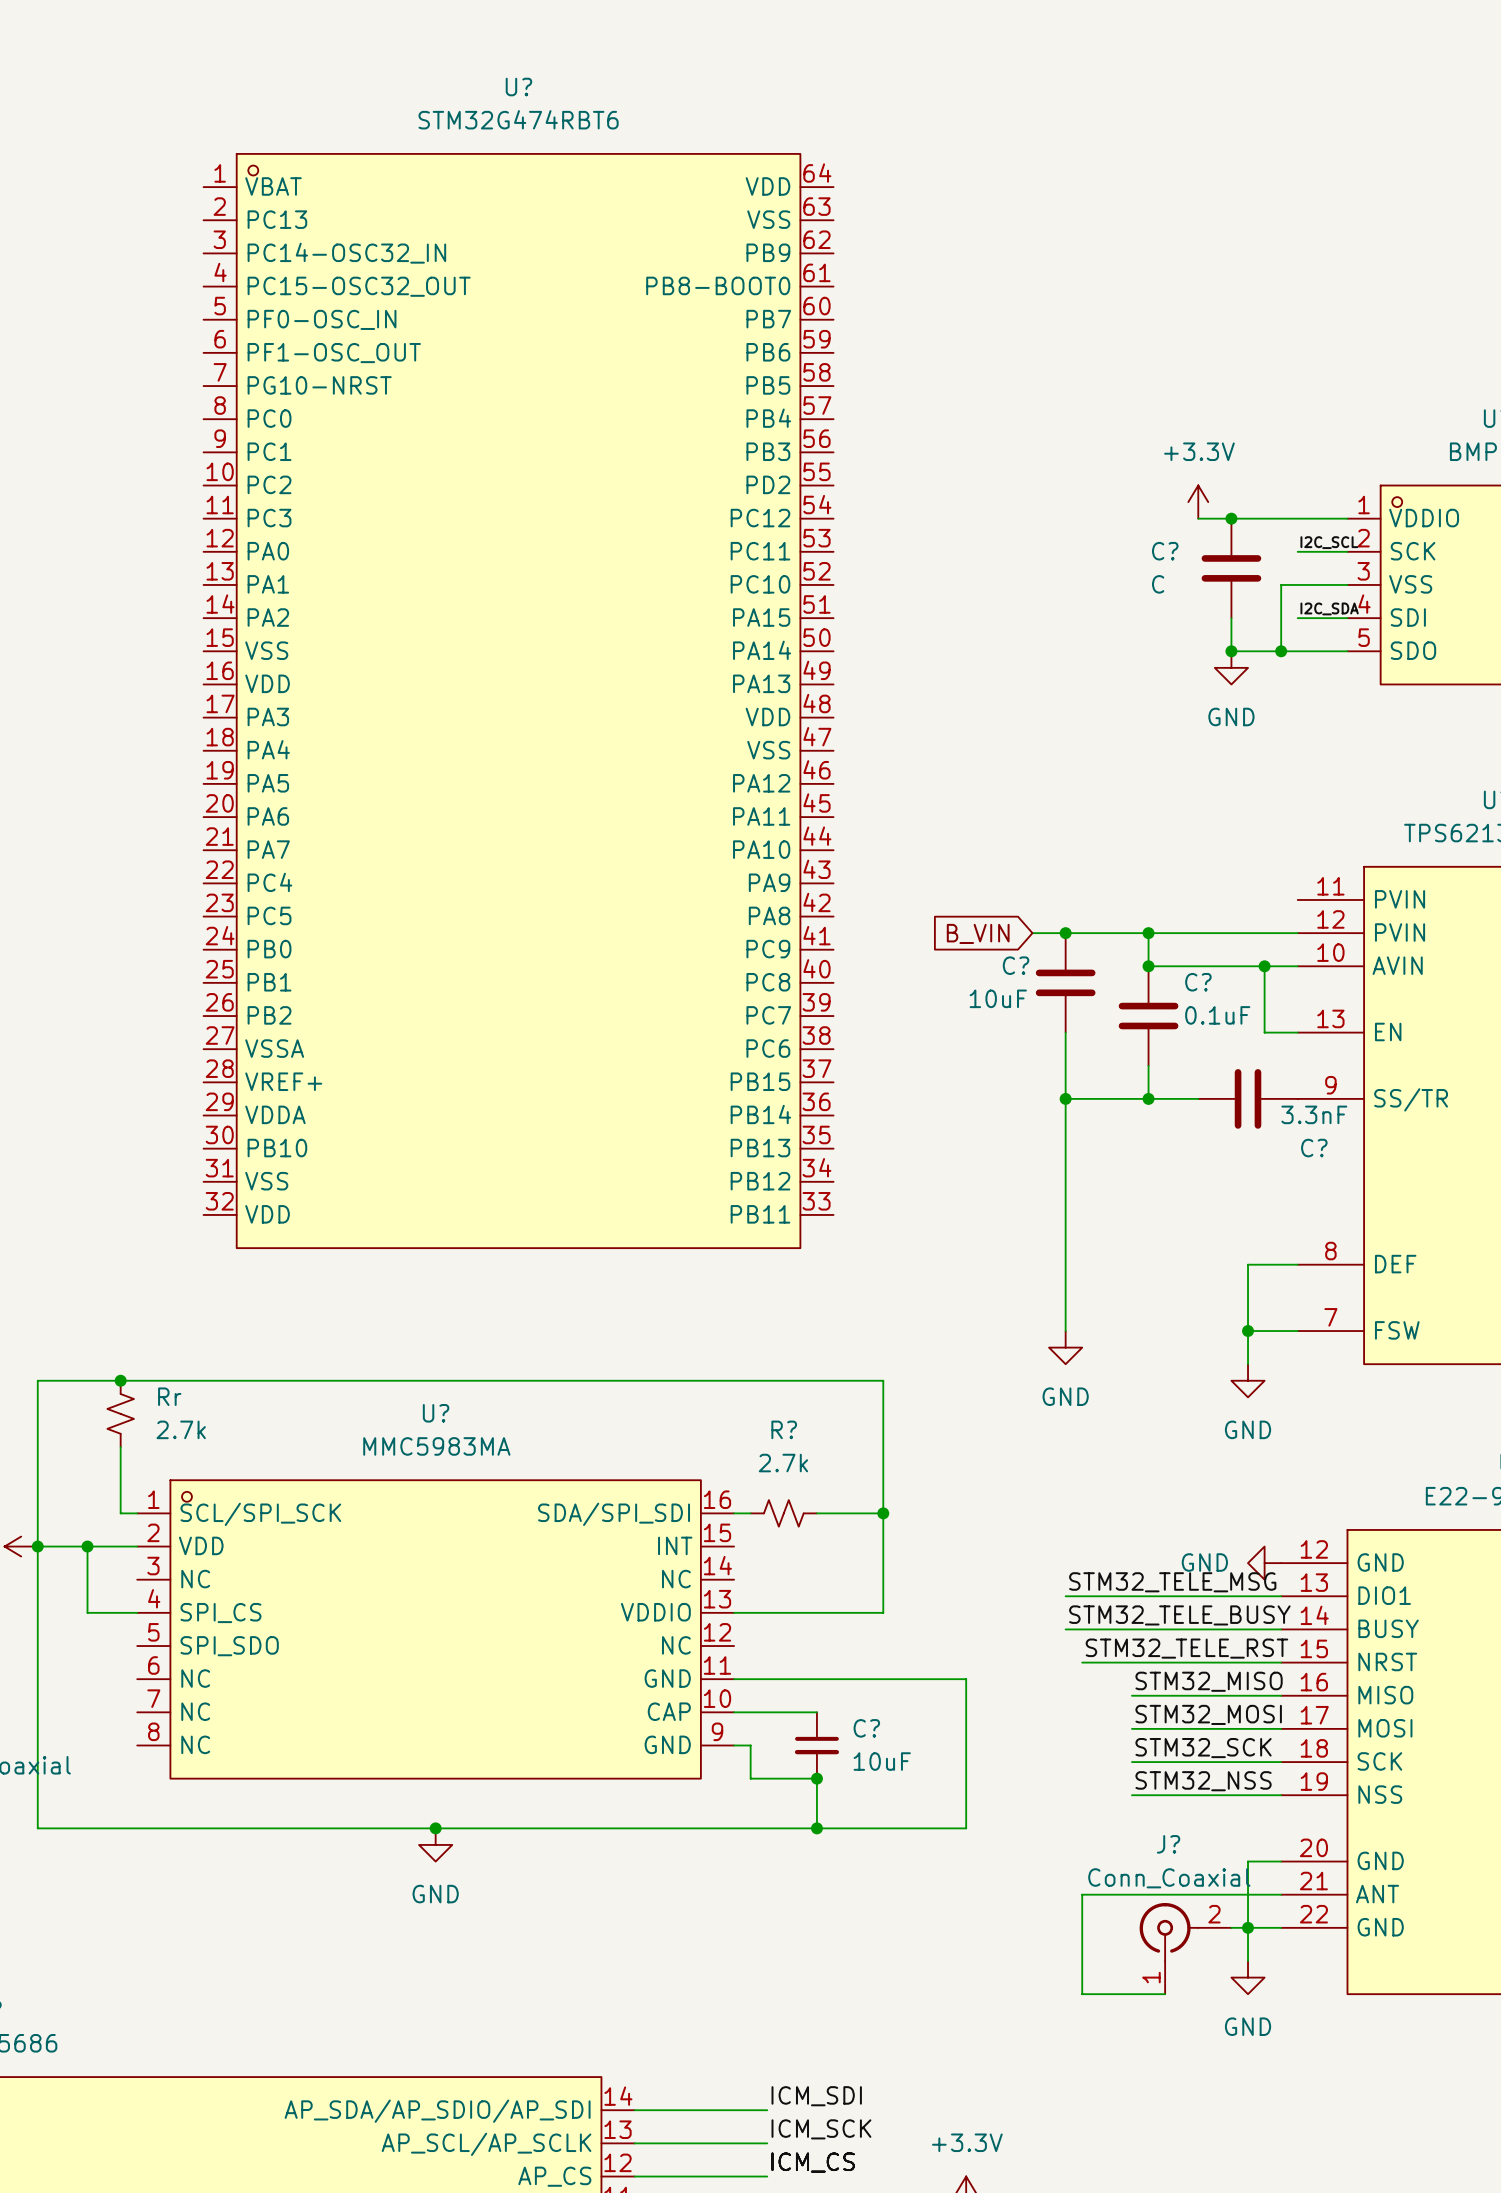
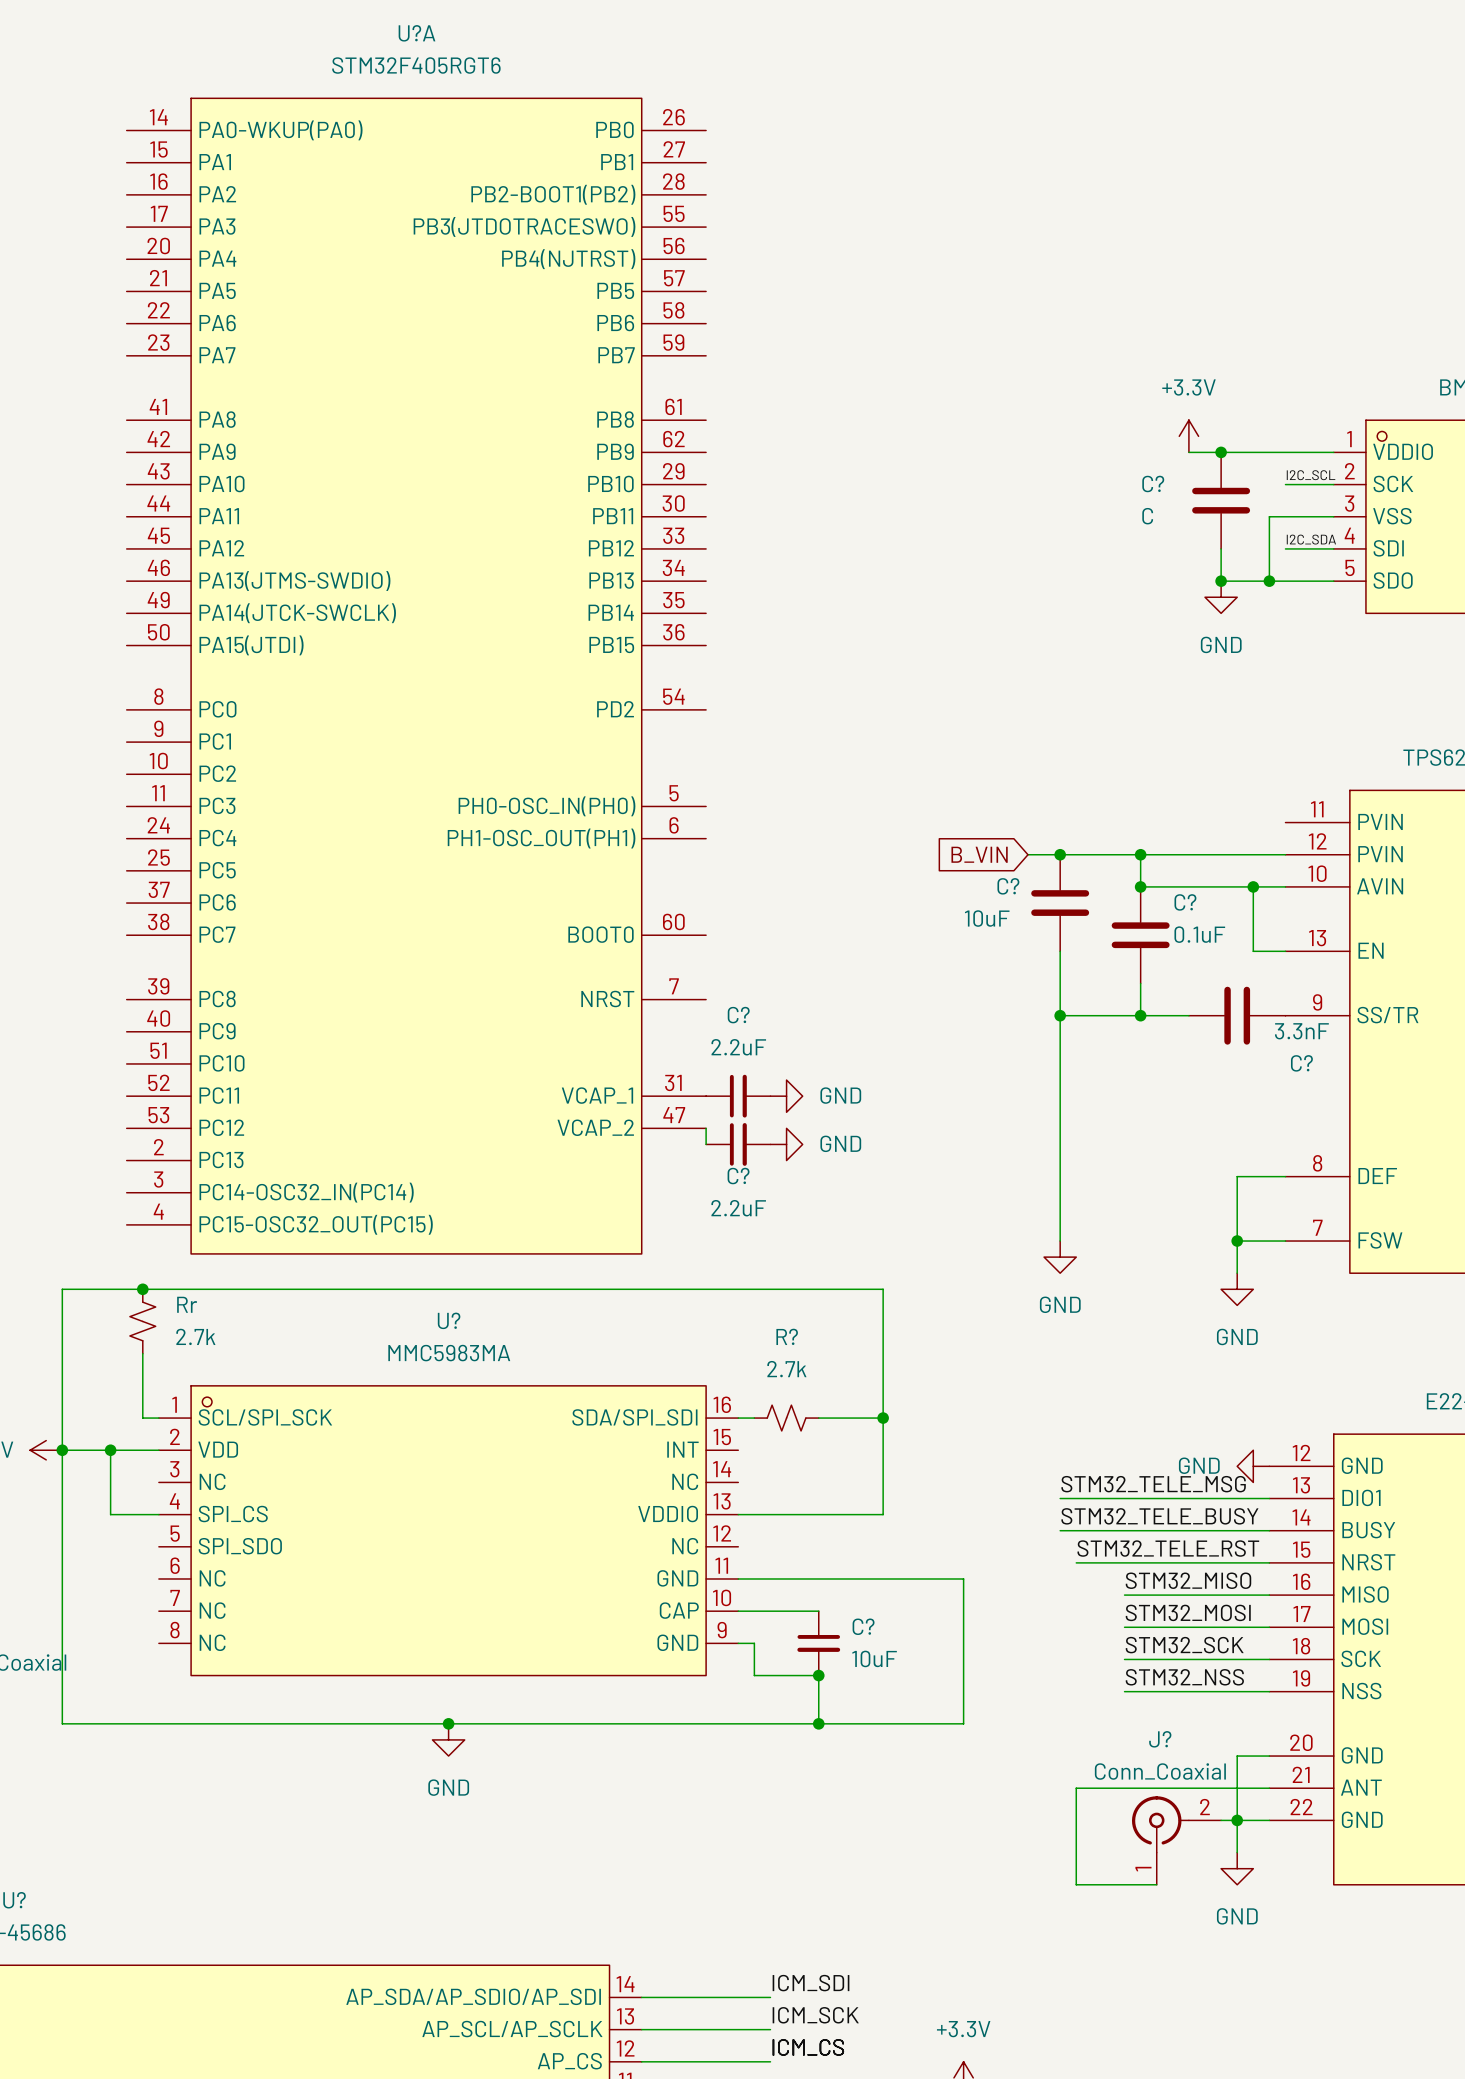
U?: STM32G474RBT6 (518, 701) -> none
U?A: none -> STM32F405RGT6 (416, 676)
C?: none -> 2.2uF (738, 1096)
power symbol: none -> GND (786, 1096)
C?: none -> 2.2uF (738, 1144)
power symbol: none -> GND (786, 1144)

